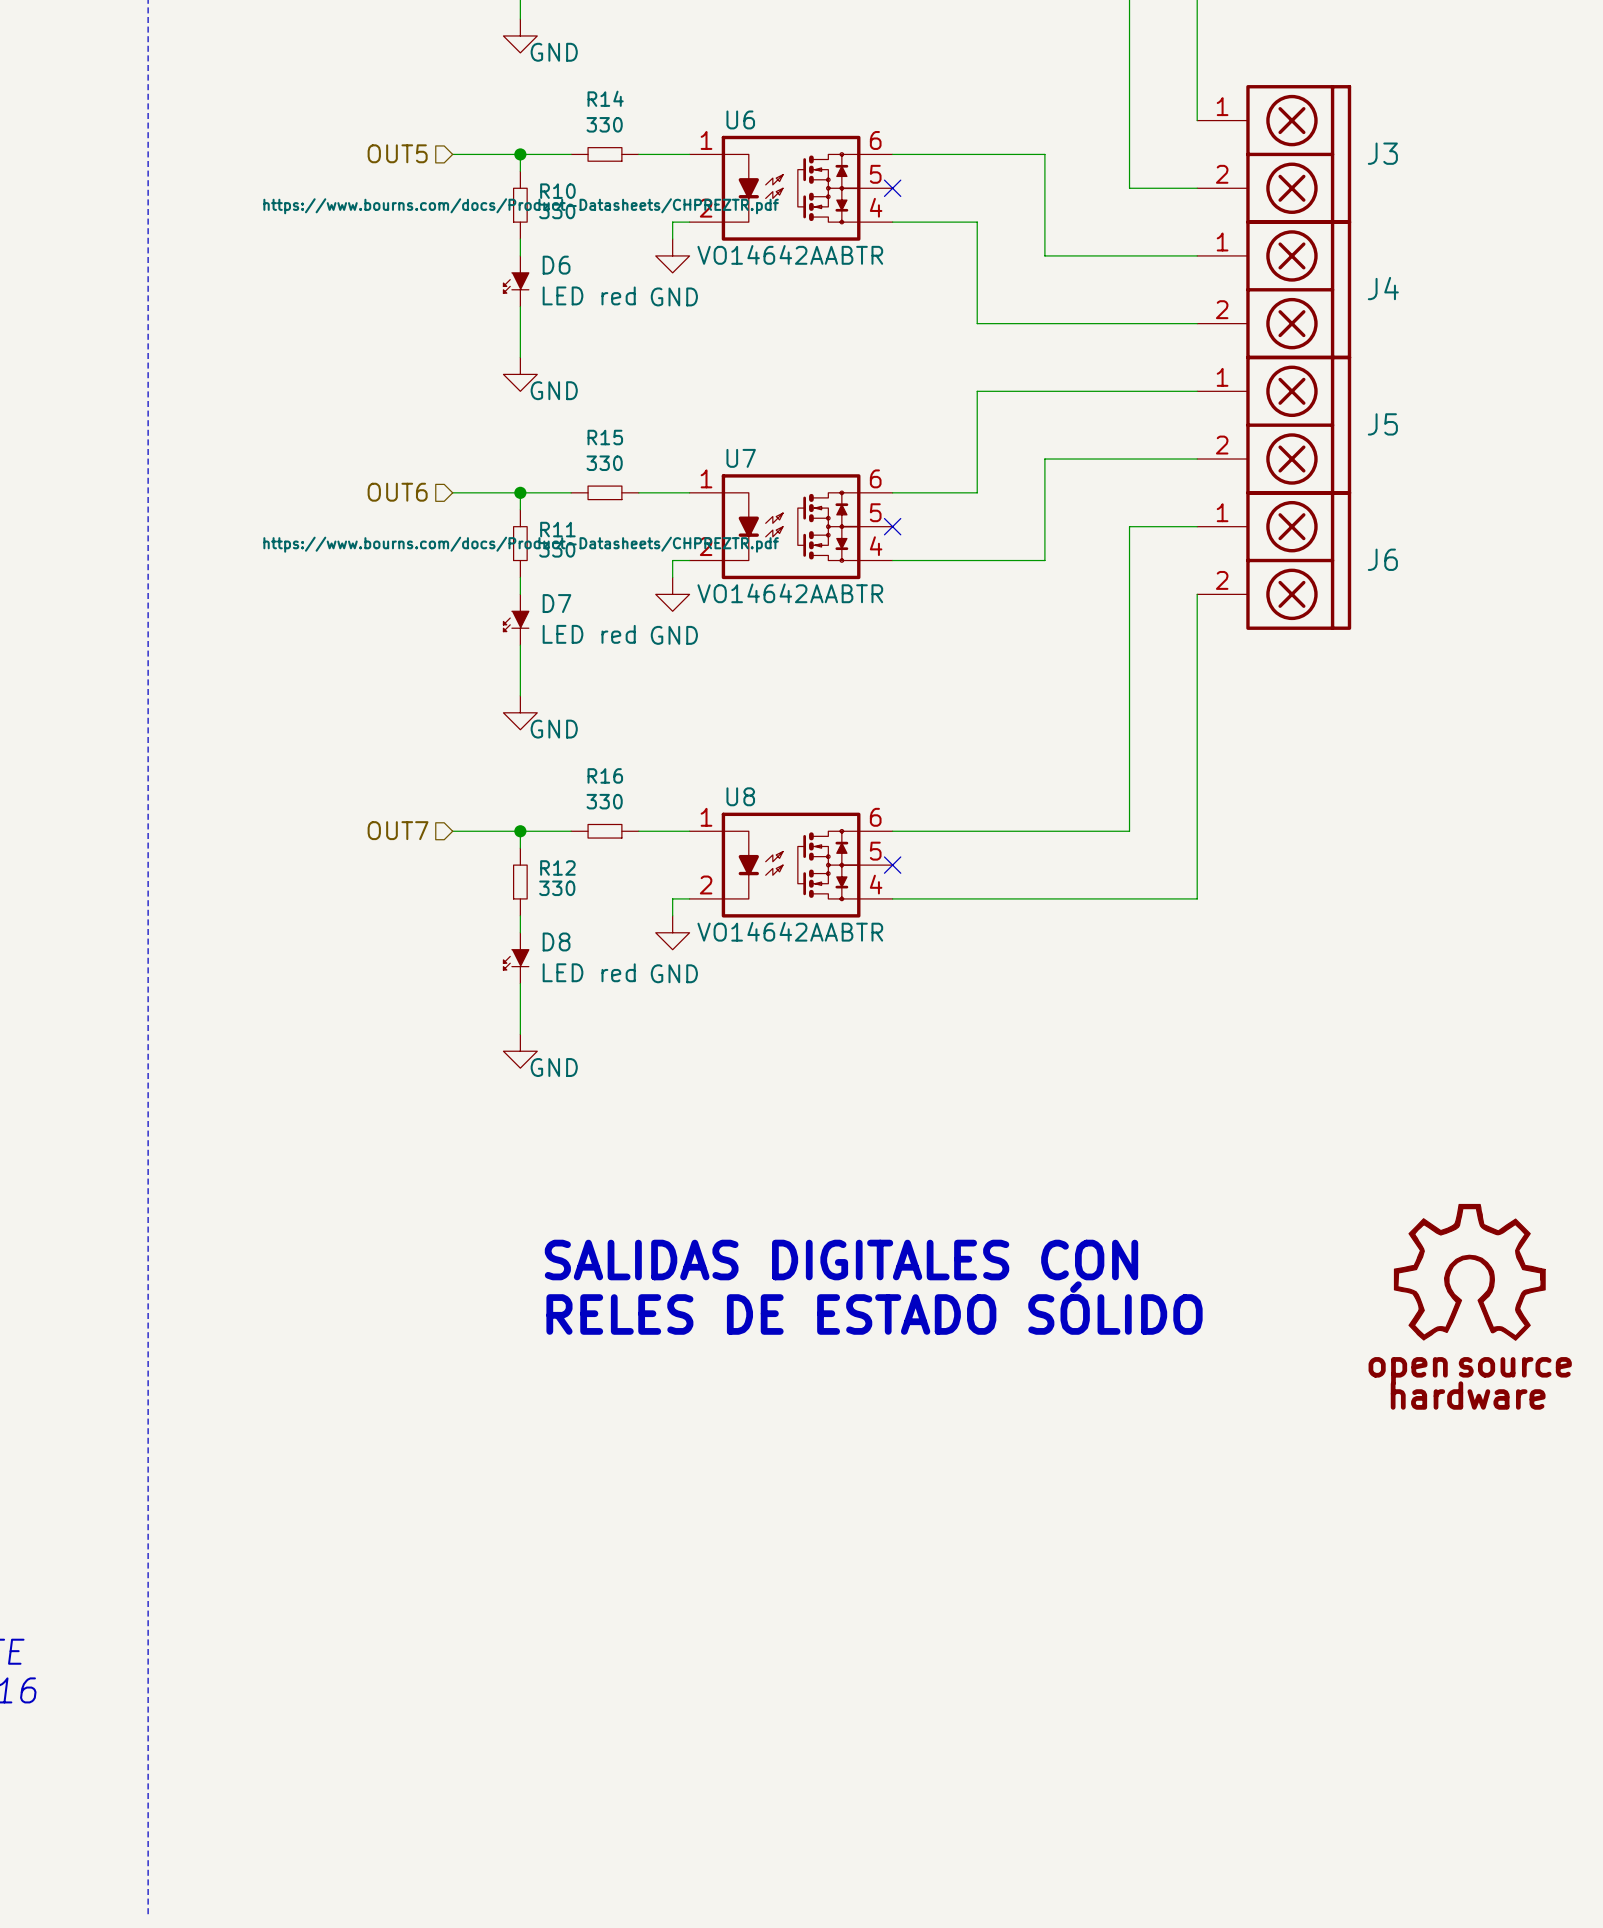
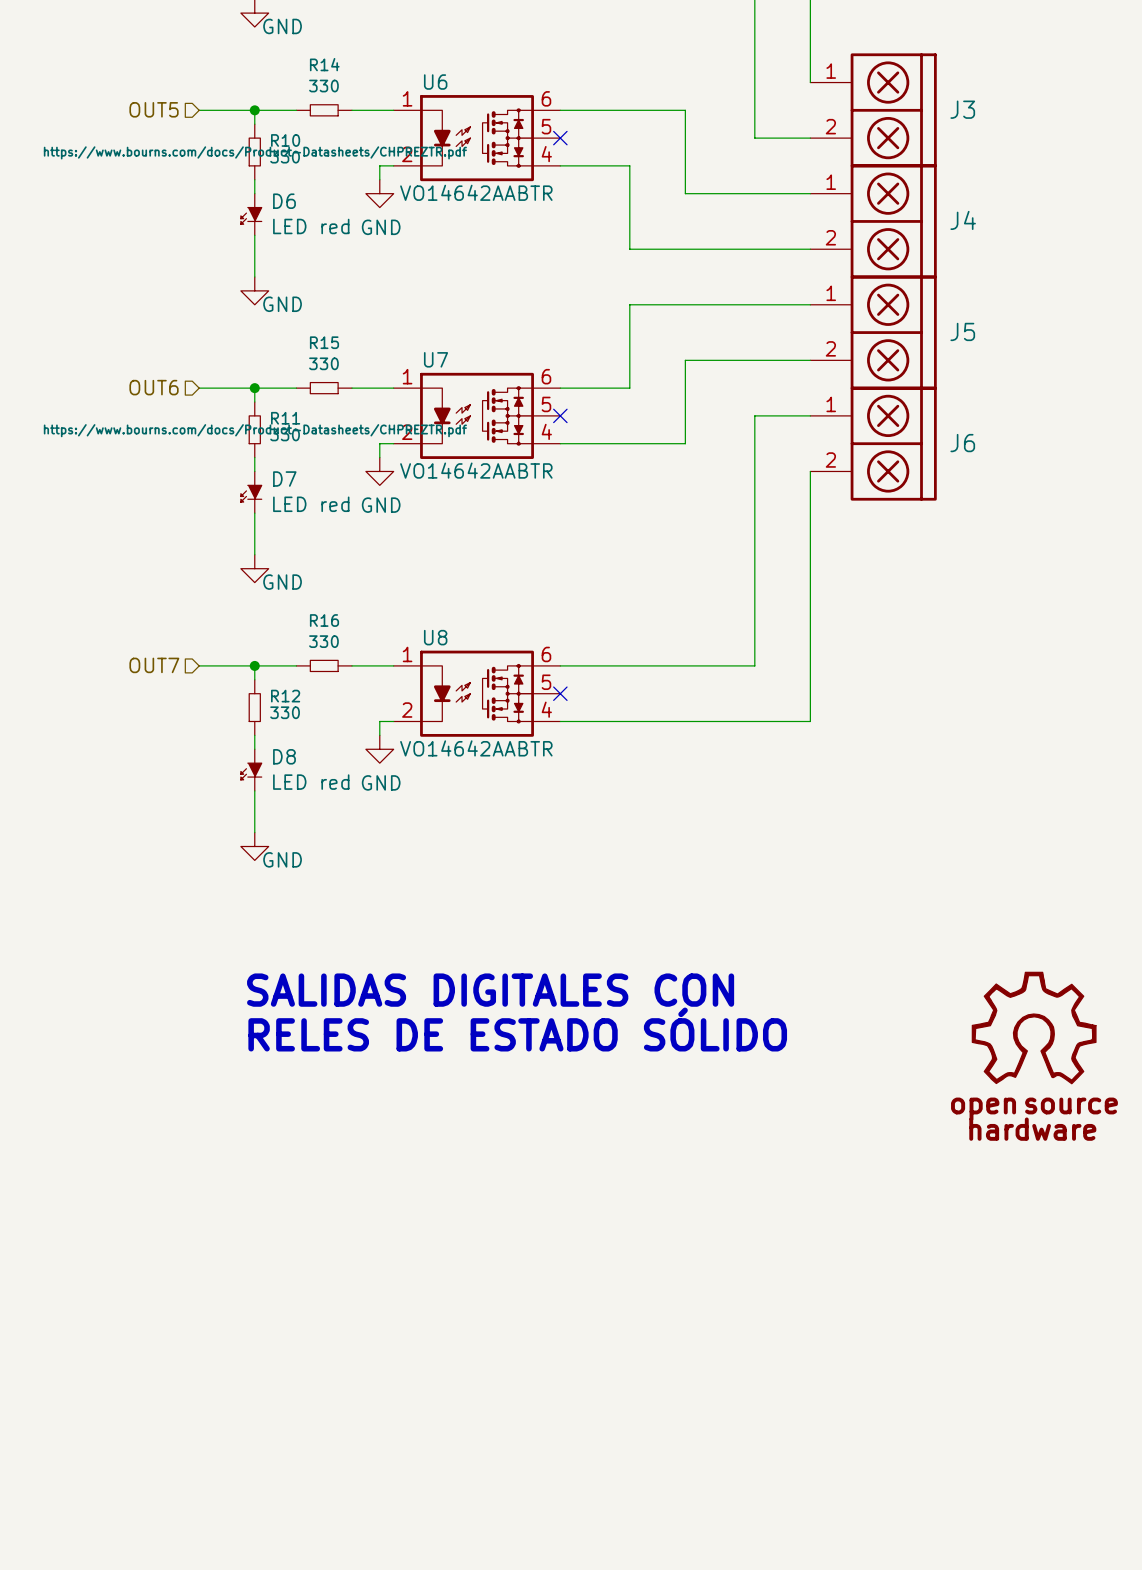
text position: SALIDAS DIGITALES CON (841, 1260) -> SALIDAS DIGITALES CON (490, 990)
text position: RELES DE ESTADO SÓLIDO (874, 1308) -> RELES DE ESTADO SÓLIDO (517, 1029)

